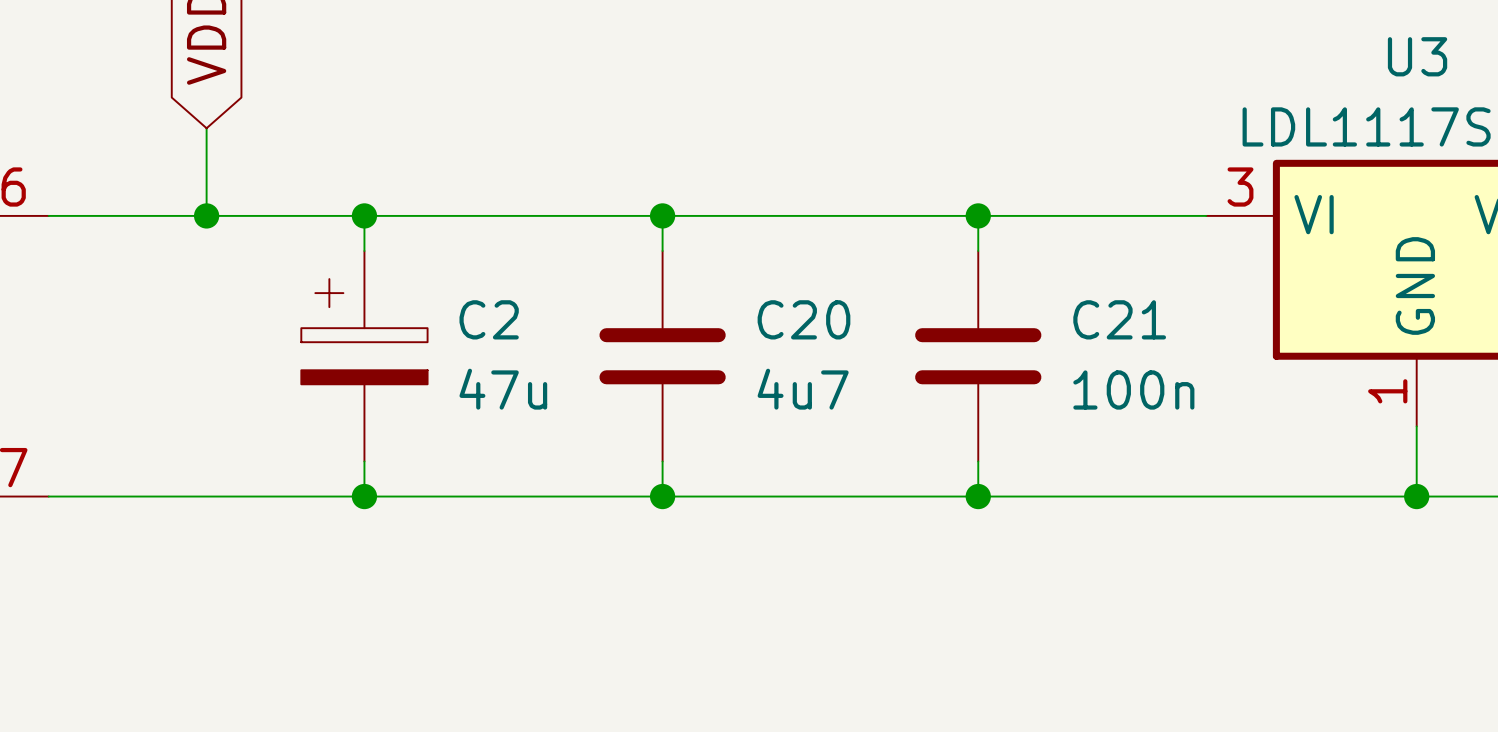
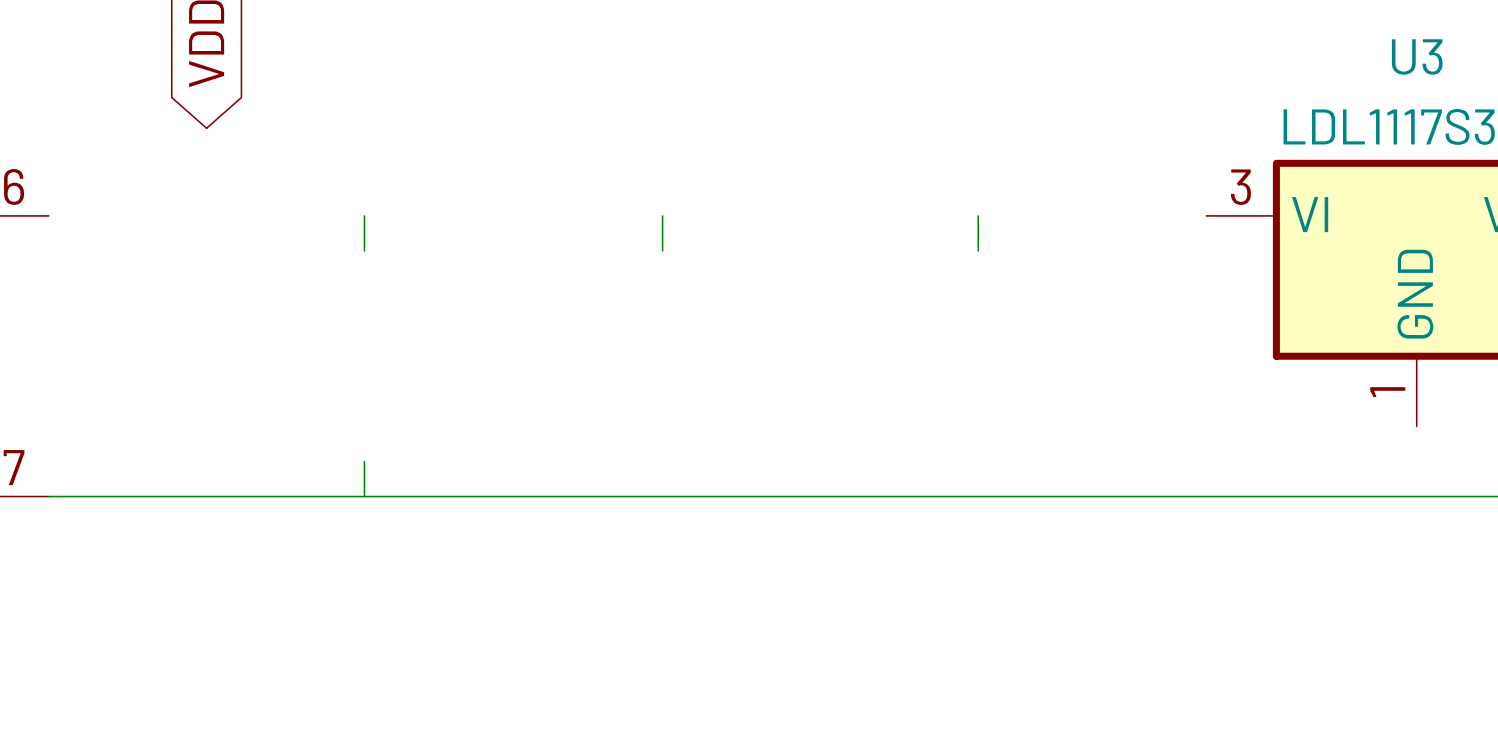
wire: (206, 128) (206, 215) -> none
wire: (48, 215) (1206, 215) -> none
junction: (206, 215) -> none
junction: (364, 215) -> none
junction: (662, 215) -> none
junction: (978, 215) -> none
C2: 47u (364, 356) -> none
C20: 4u7 (662, 356) -> none
C21: 100n (978, 356) -> none
wire: (1416, 426) (1416, 496) -> none
wire: (662, 461) (662, 496) -> none
wire: (978, 461) (978, 496) -> none
junction: (364, 496) -> none
junction: (662, 496) -> none
junction: (978, 496) -> none
junction: (1416, 496) -> none

